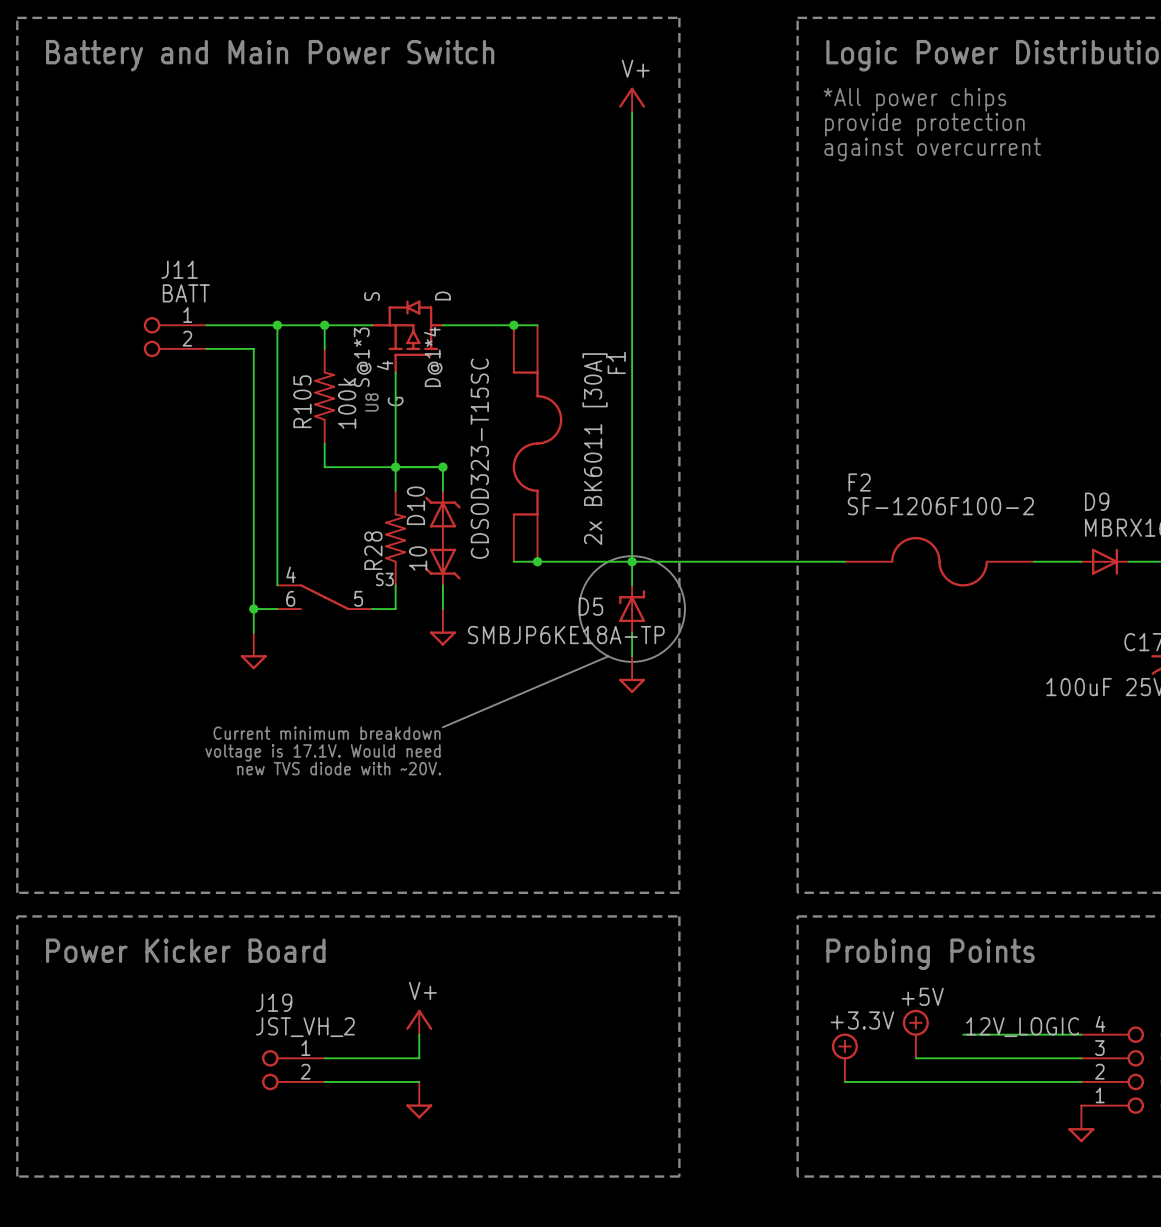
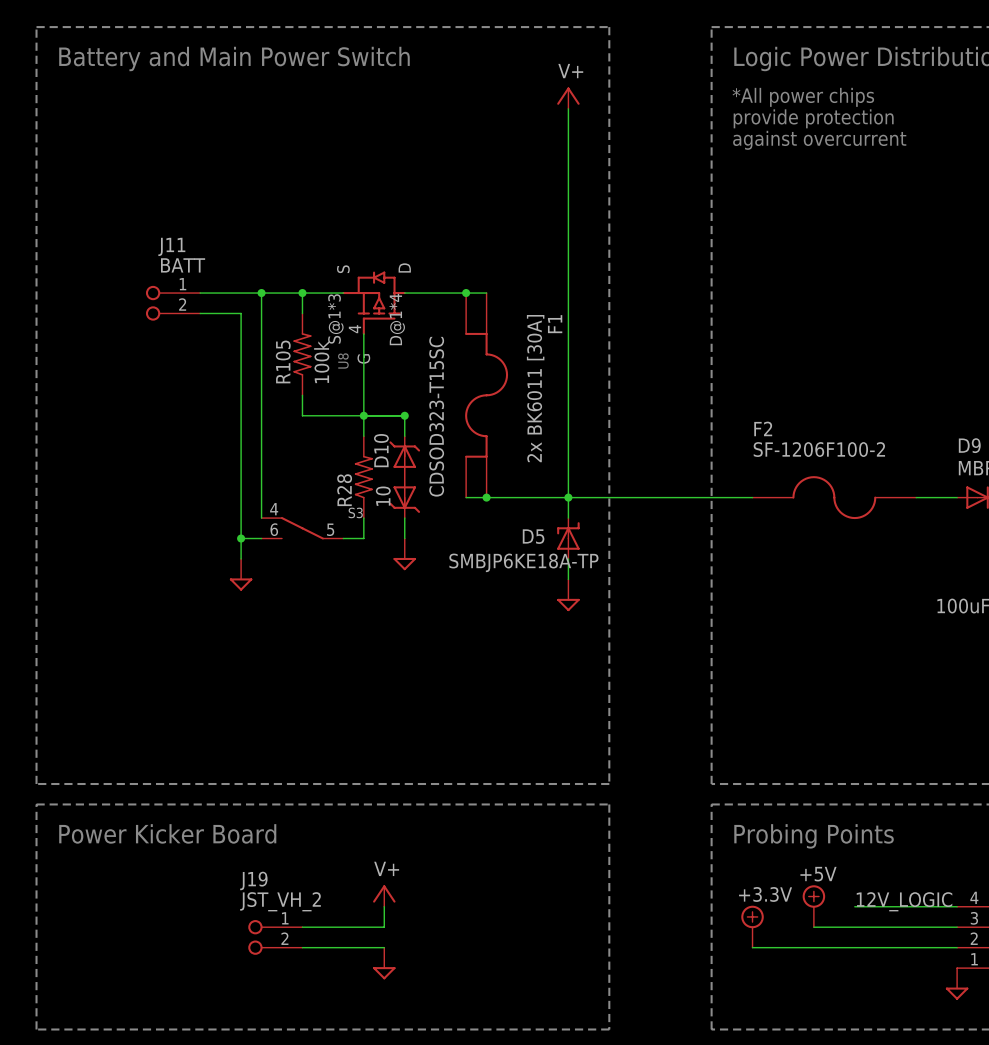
drawing: [578, 555, 686, 663] -> none
line: (608, 656) (442, 727) -> none
text: Current minimum breakdown (327, 733) -> none
text: voltage is 17.1V. Would need (322, 752) -> none
text: new TVS diode with ~20V. (339, 768) -> none

